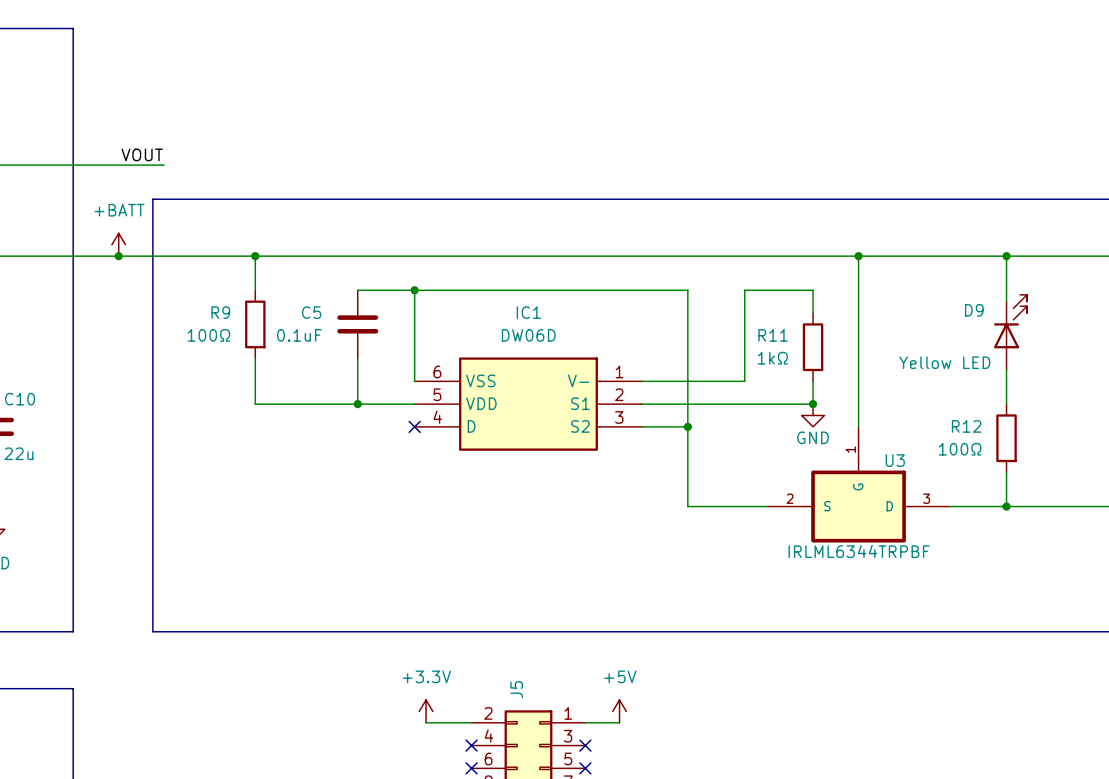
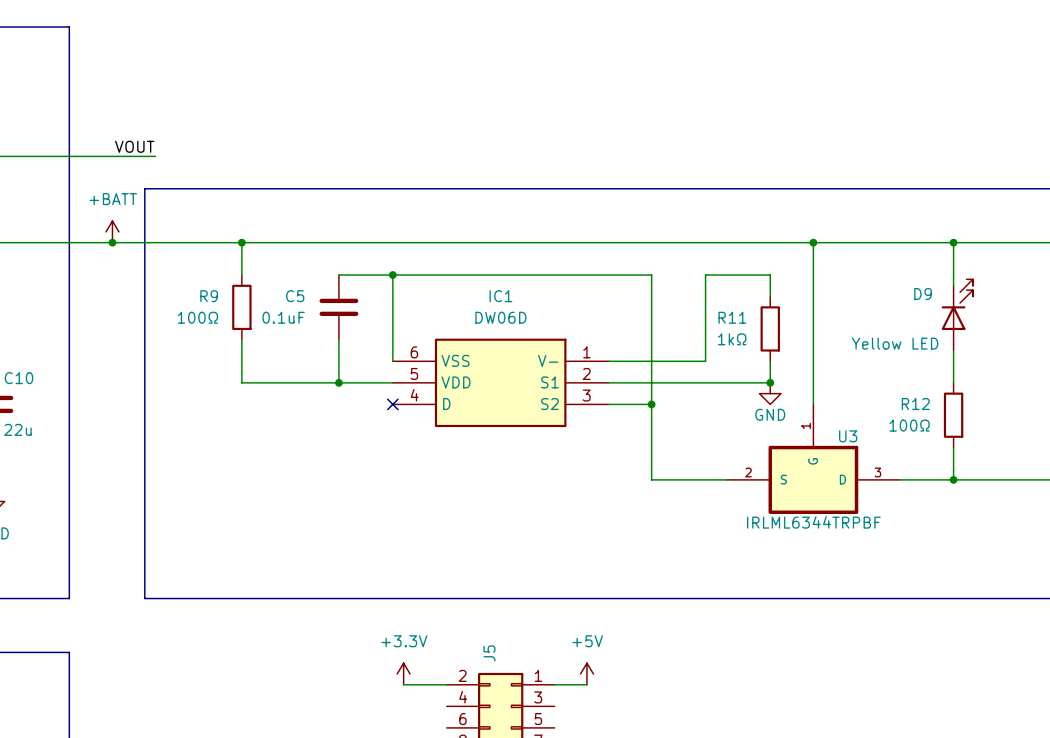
no-connect mark: (471, 745) -> none
no-connect mark: (585, 745) -> none
no-connect mark: (471, 768) -> none
no-connect mark: (585, 768) -> none

